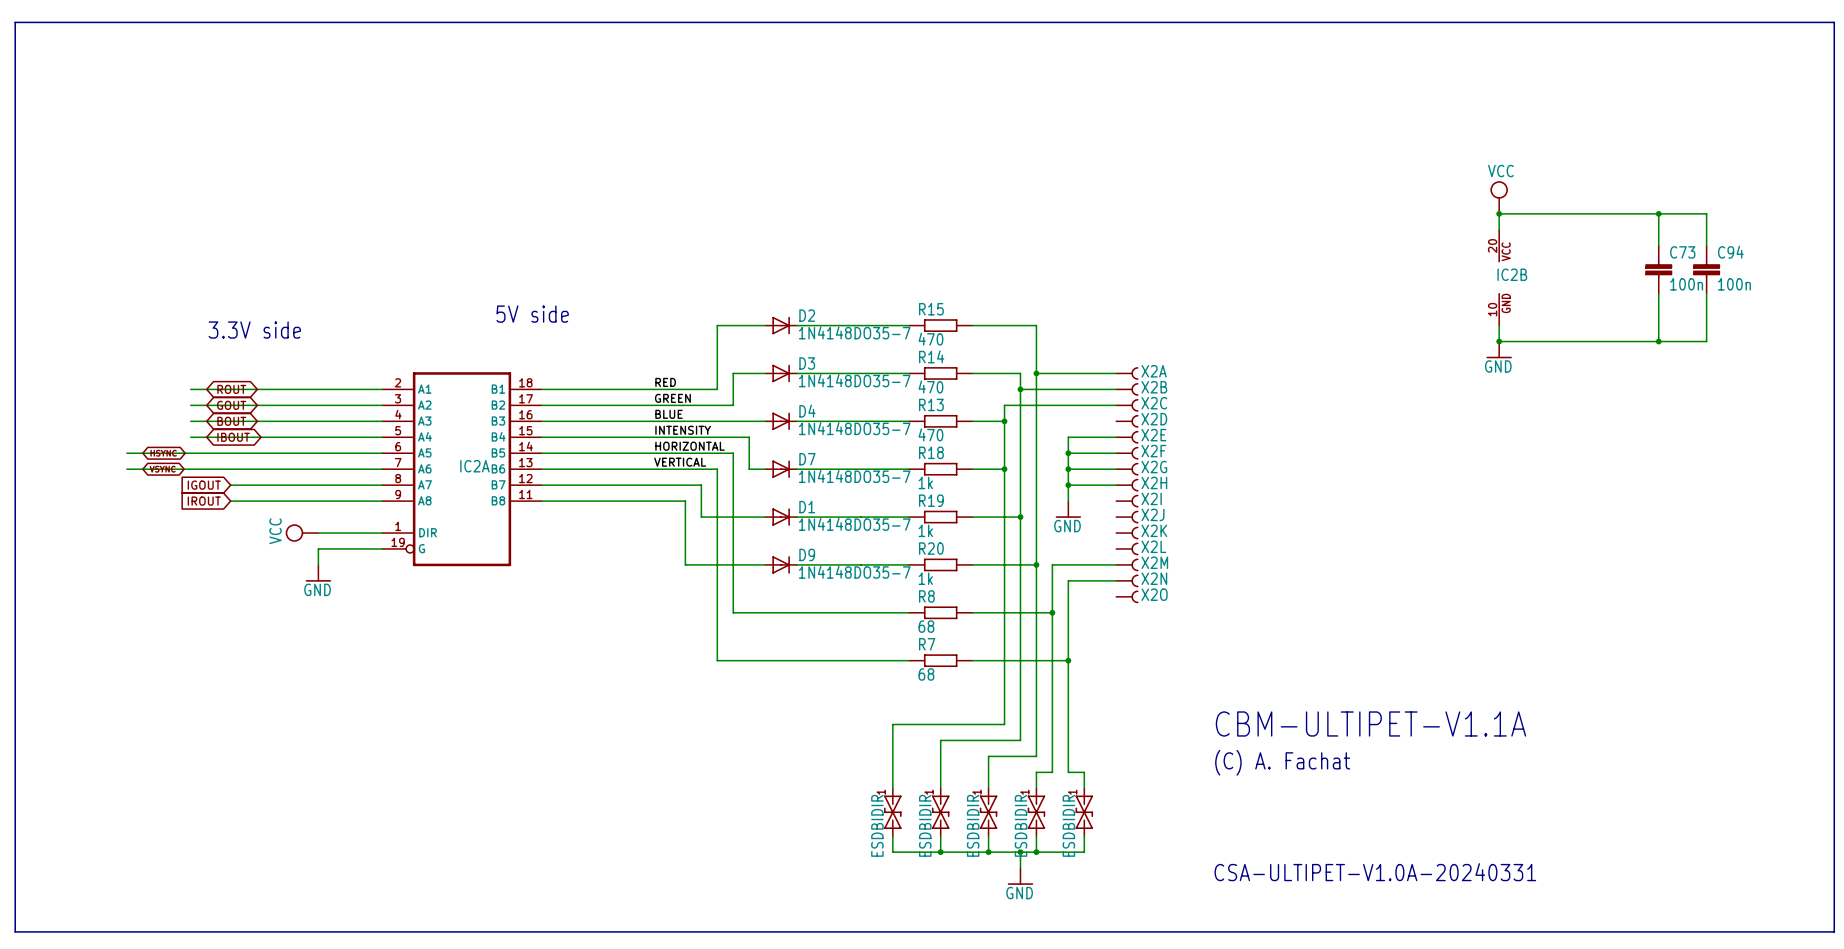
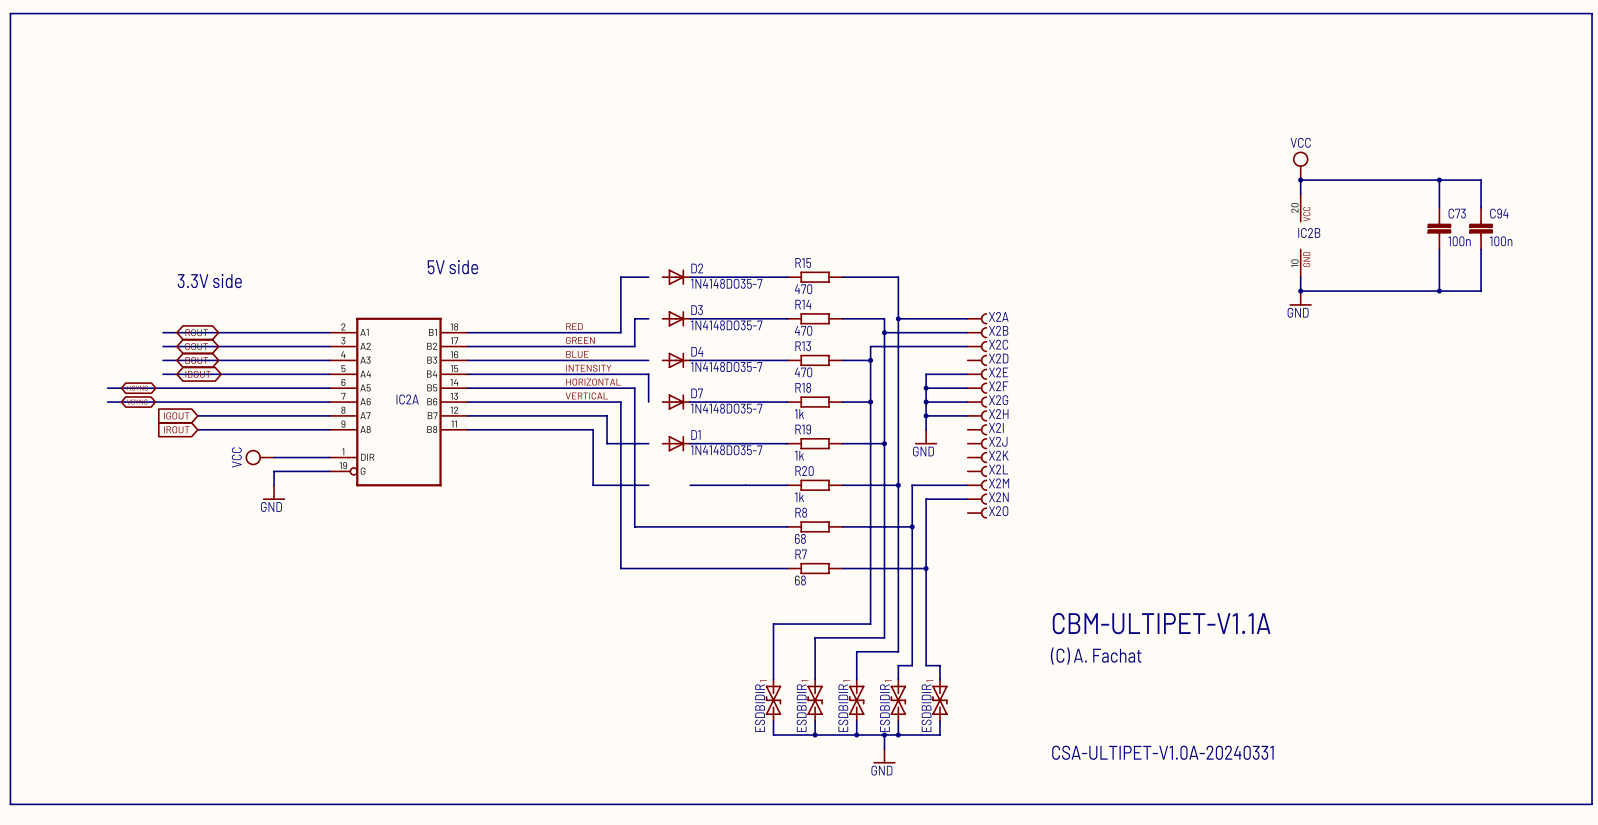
wire: (749, 325) (765, 325) -> none
wire: (749, 373) (765, 373) -> none
wire: (749, 421) (765, 421) -> none
wire: (749, 469) (765, 469) -> none
wire: (749, 517) (765, 517) -> none
wire: (749, 564) (765, 564) -> none
D9: 1N4148DO35-7 (781, 564) -> none

